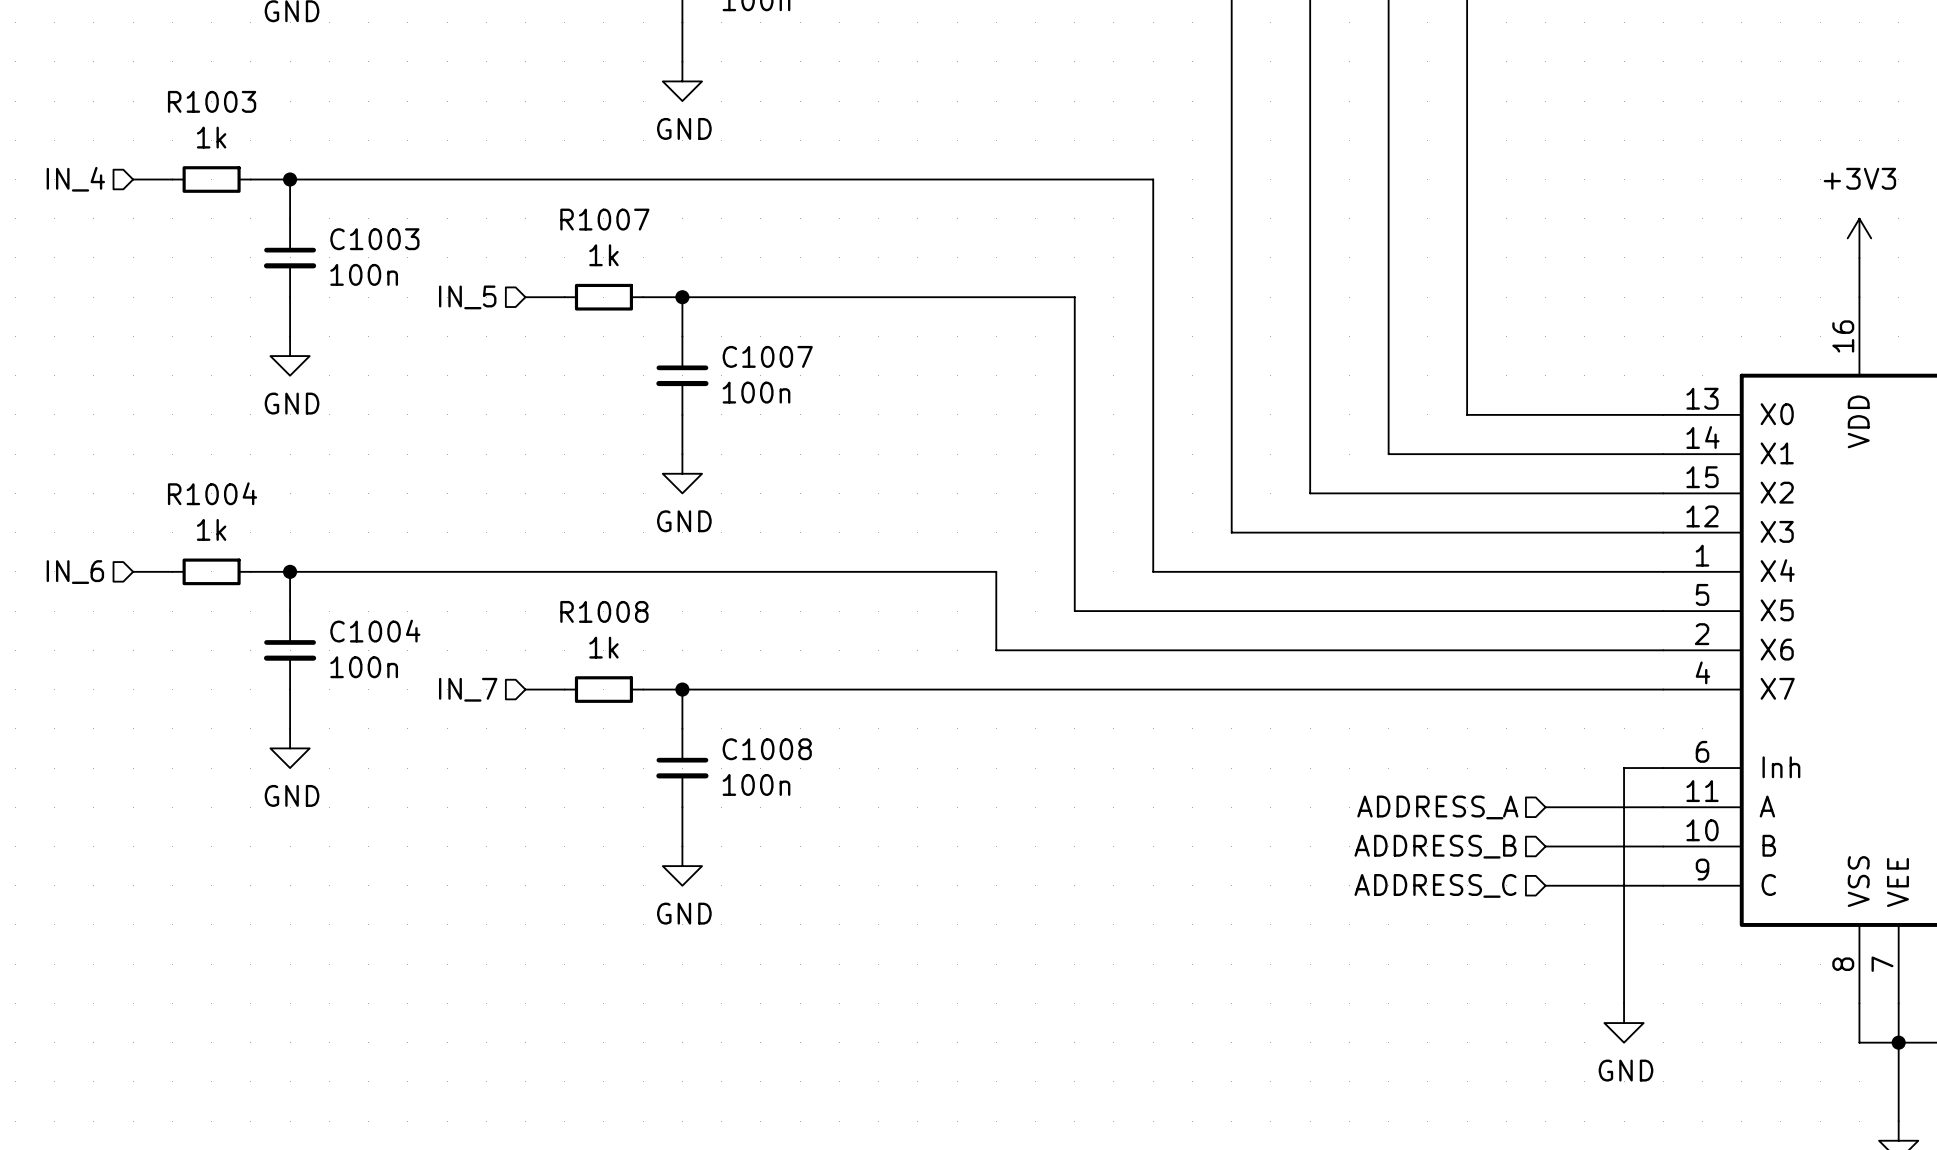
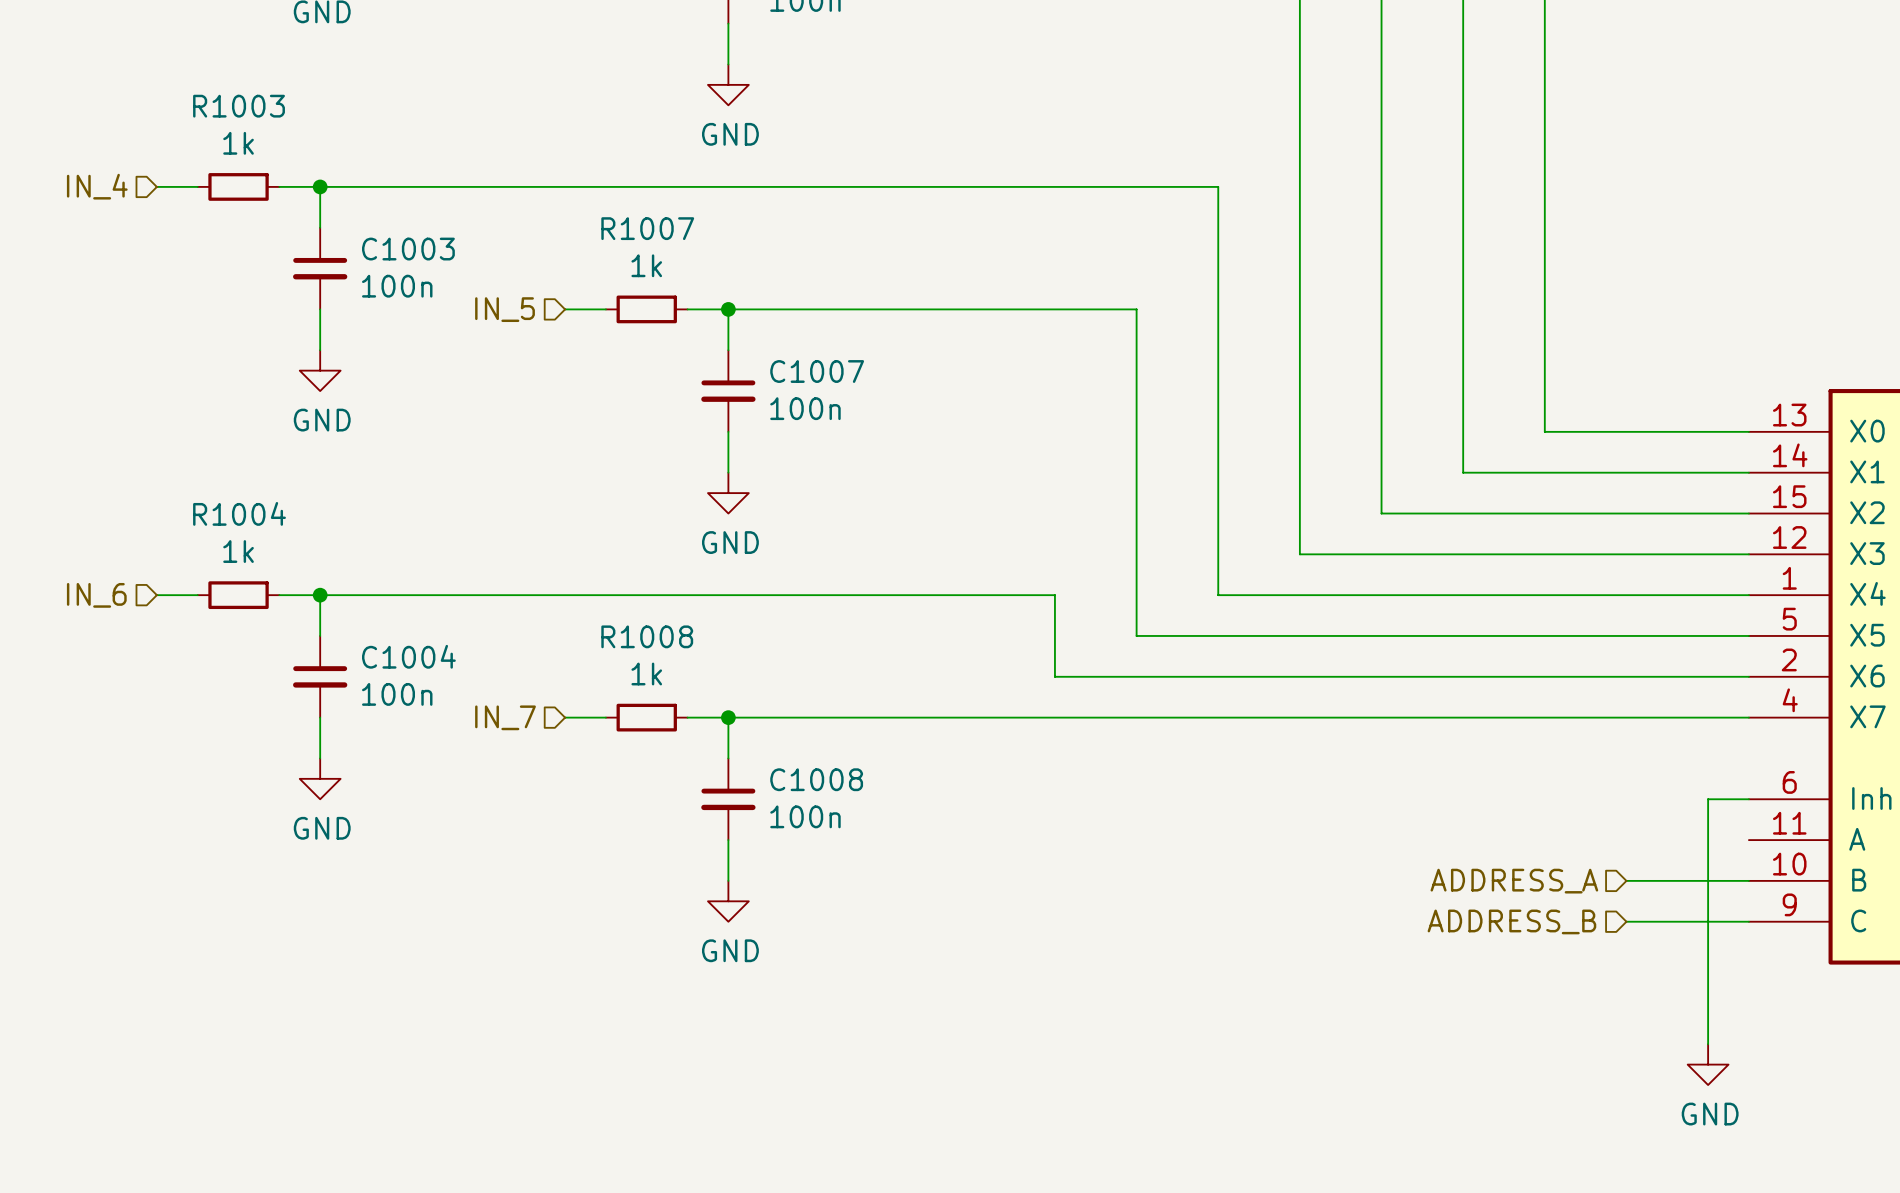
hierarchical label: ADDRESS_A (1437, 807) -> none
wire: (1545, 807) (1663, 807) -> none
hierarchical label: ADDRESS_B (1435, 846) -> ADDRESS_A (1514, 881)
hierarchical label: ADDRESS_C (1435, 885) -> ADDRESS_B (1511, 921)

